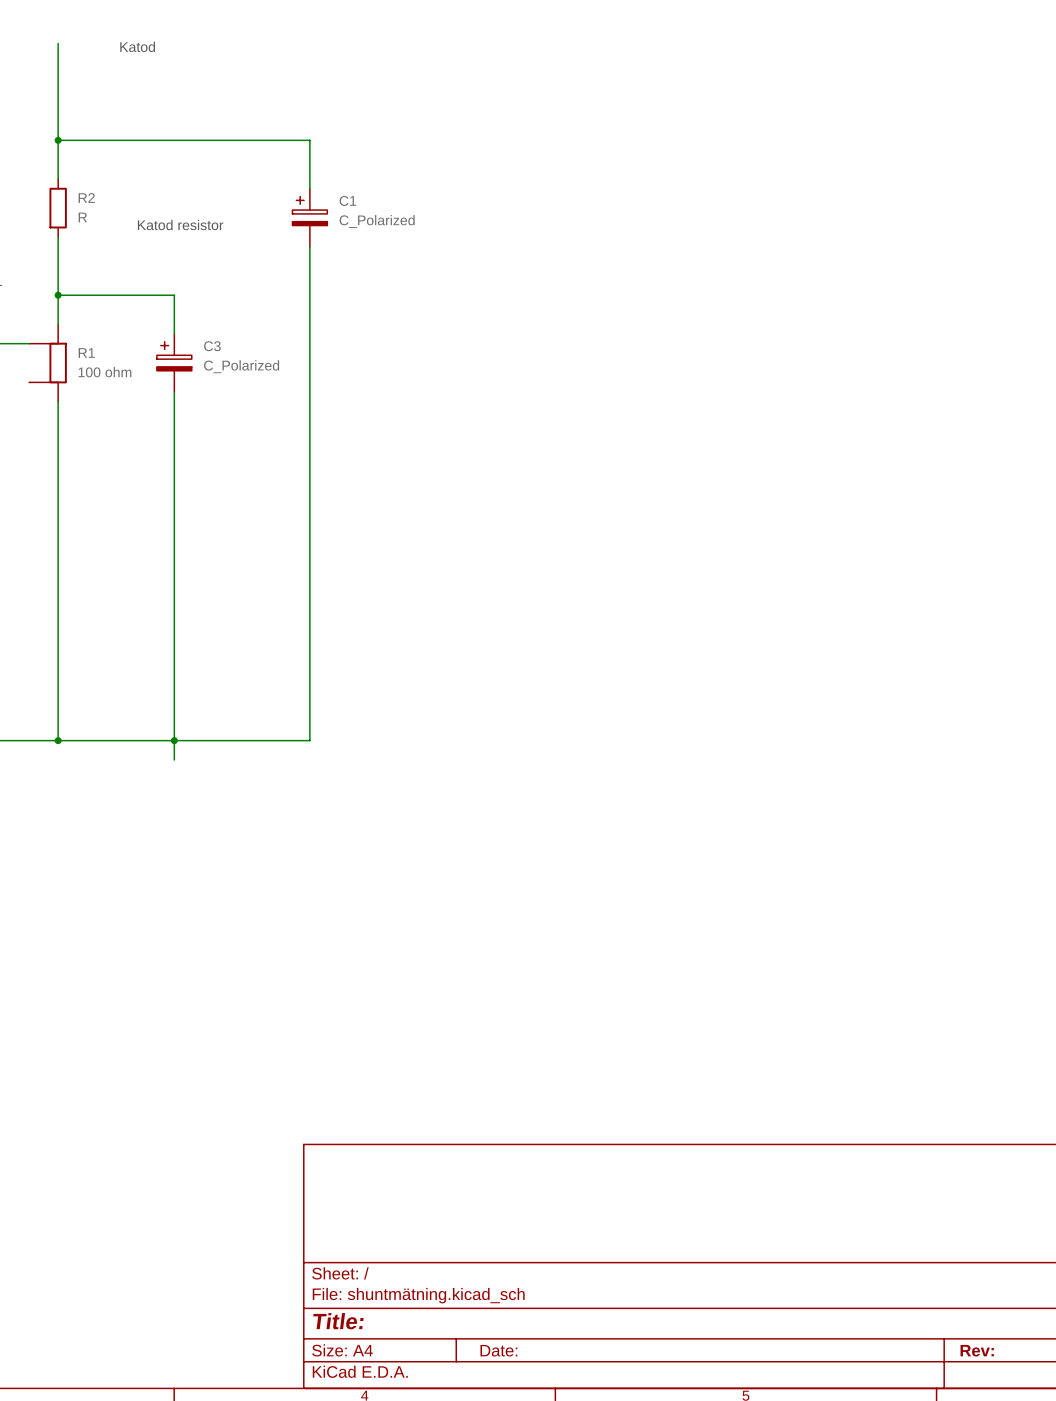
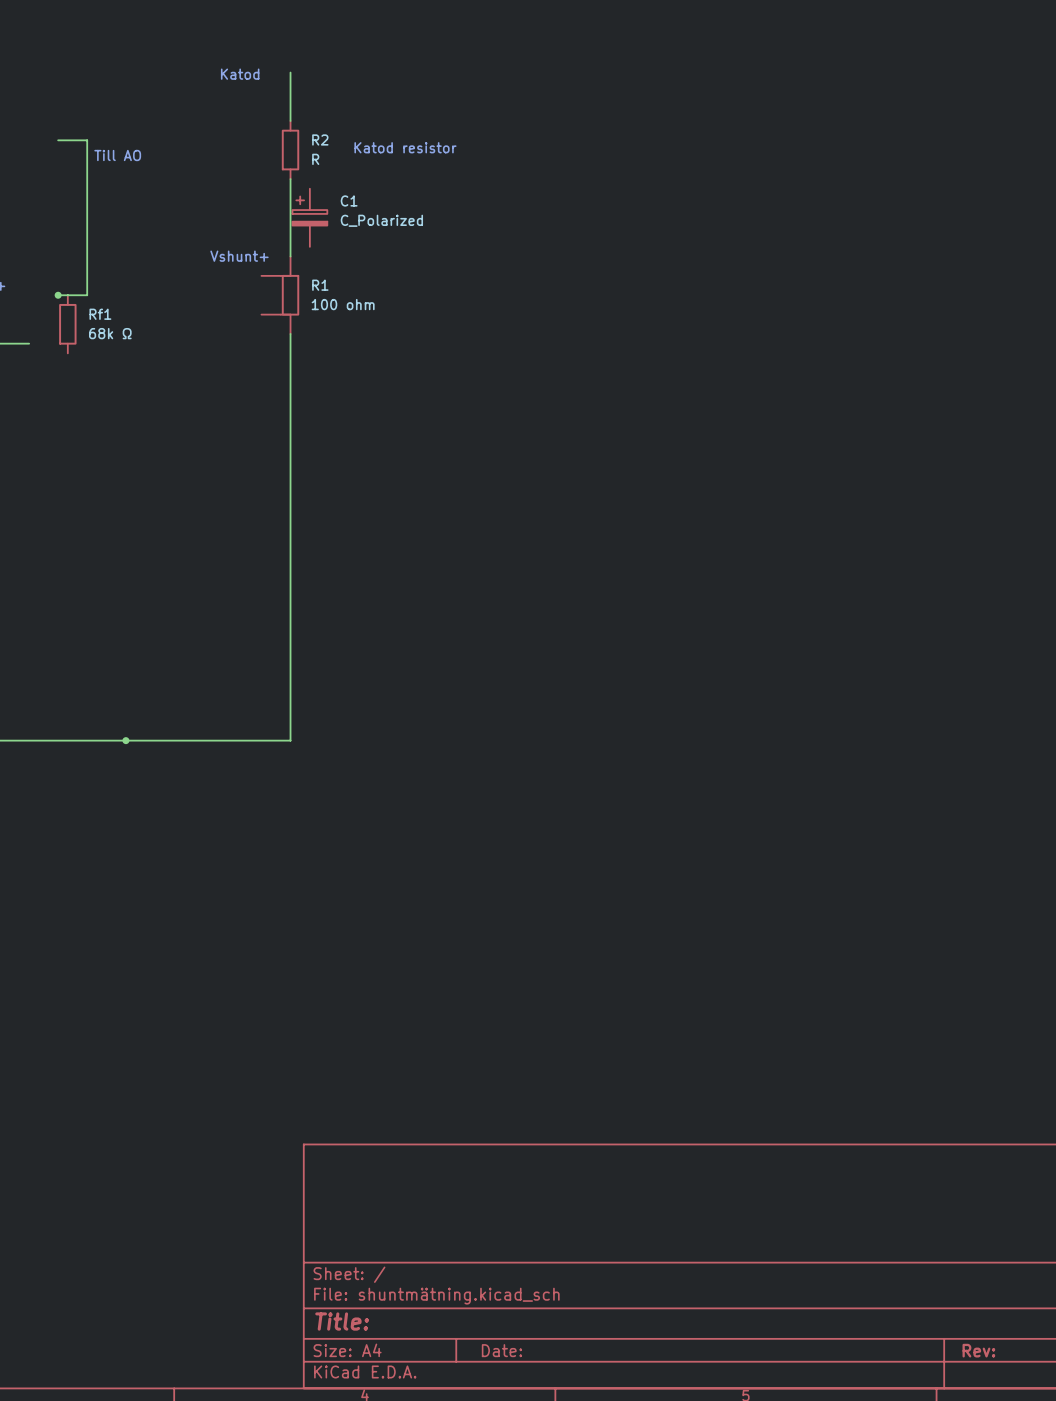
wire: (58, 43) (58, 179) -> none
text position: Katod (137, 46) -> Katod (240, 74)
wire: none -> (290, 72) (290, 120)
junction: (58, 140) -> none
wire: (87, 140) (309, 140) (309, 188) -> none
text: none -> Katod resistor (405, 147)
text: none -> Till AO (117, 155)
wire: none -> (290, 179) (290, 256)
R2 position: (58, 208) -> (290, 150)
text: Katod resistor (180, 225) -> none
wire: (58, 237) (58, 324) -> none
wire: (309, 246) (309, 740) (290, 740) -> (290, 333) (290, 740)
text: none -> Vshunt+ (239, 256)
wire: (87, 295) (174, 295) (174, 333) -> (87, 295) (87, 140)
Rf1: none -> 68k Ω (67, 324)
R1 position: (47, 363) -> (280, 295)
C3: C_Polarized (174, 363) -> none
wire: (174, 392) (174, 759) -> none
wire: (58, 401) (58, 740) -> none
junction: (58, 740) -> none
junction: none -> (125, 740)
junction: (174, 740) -> none

